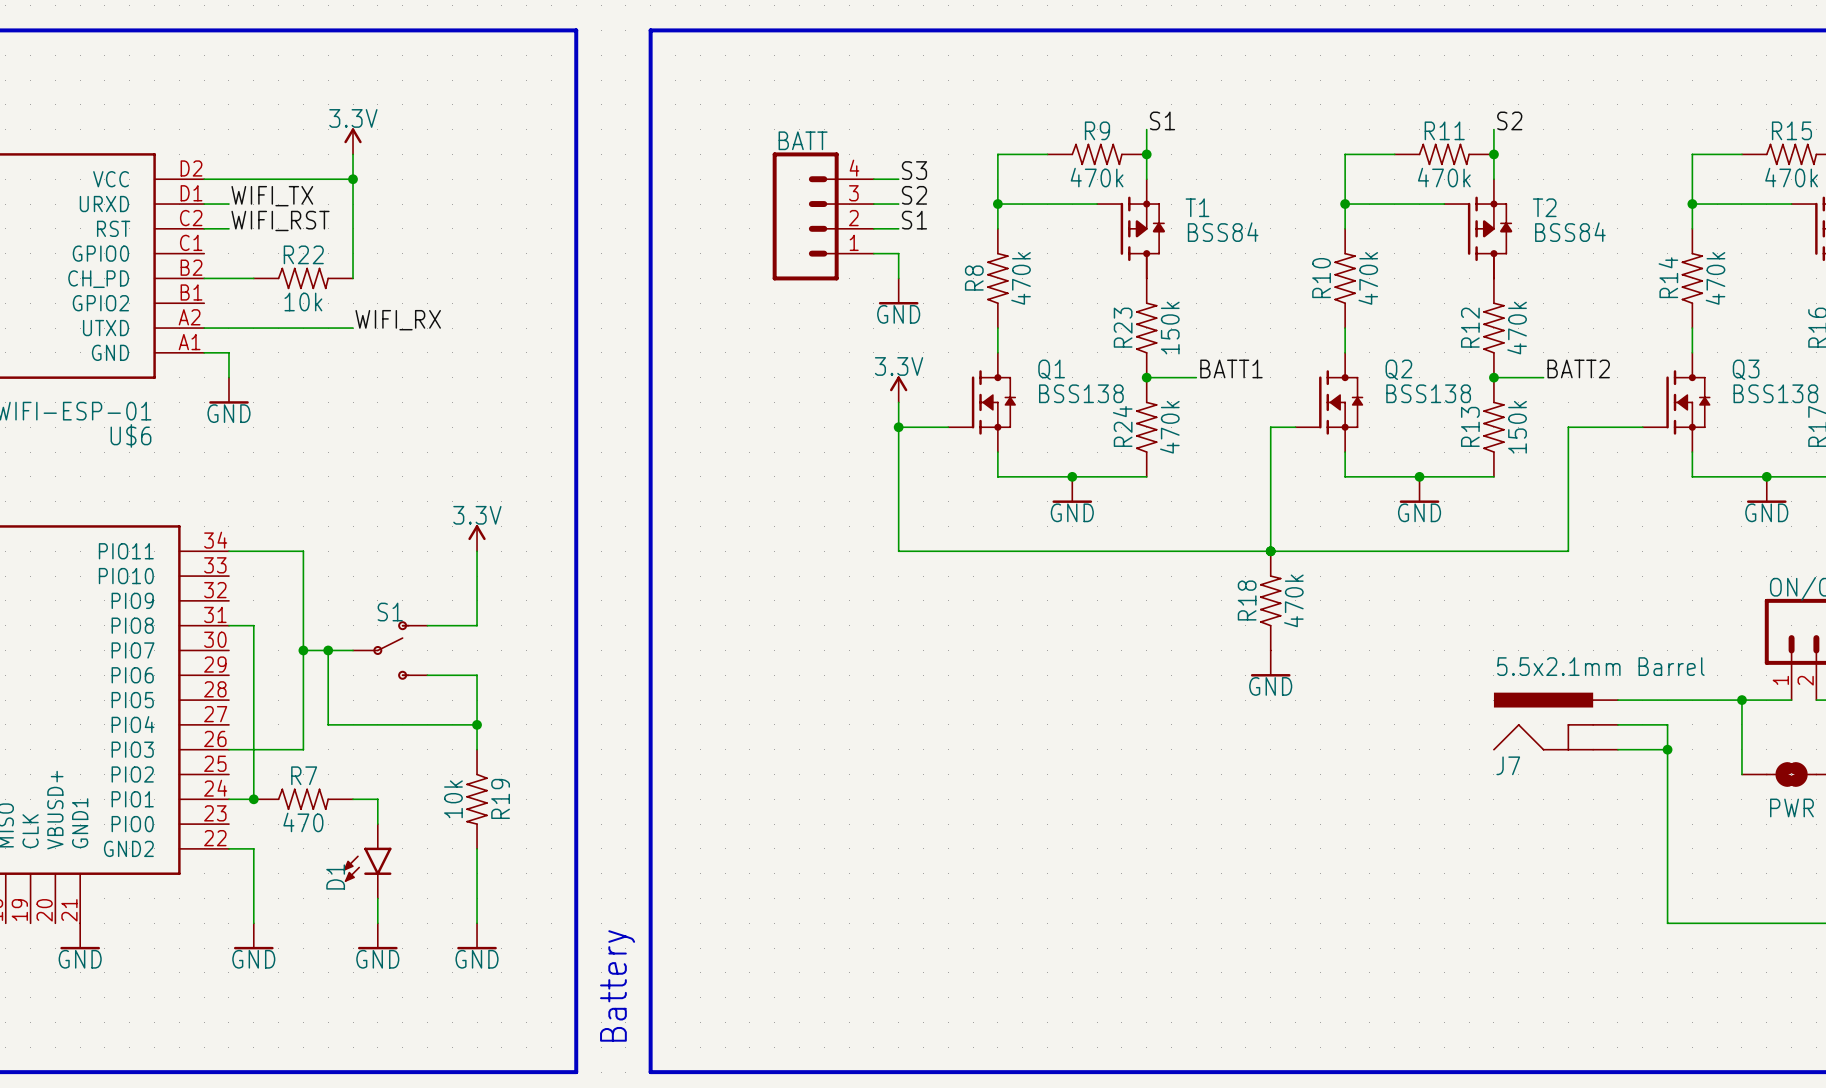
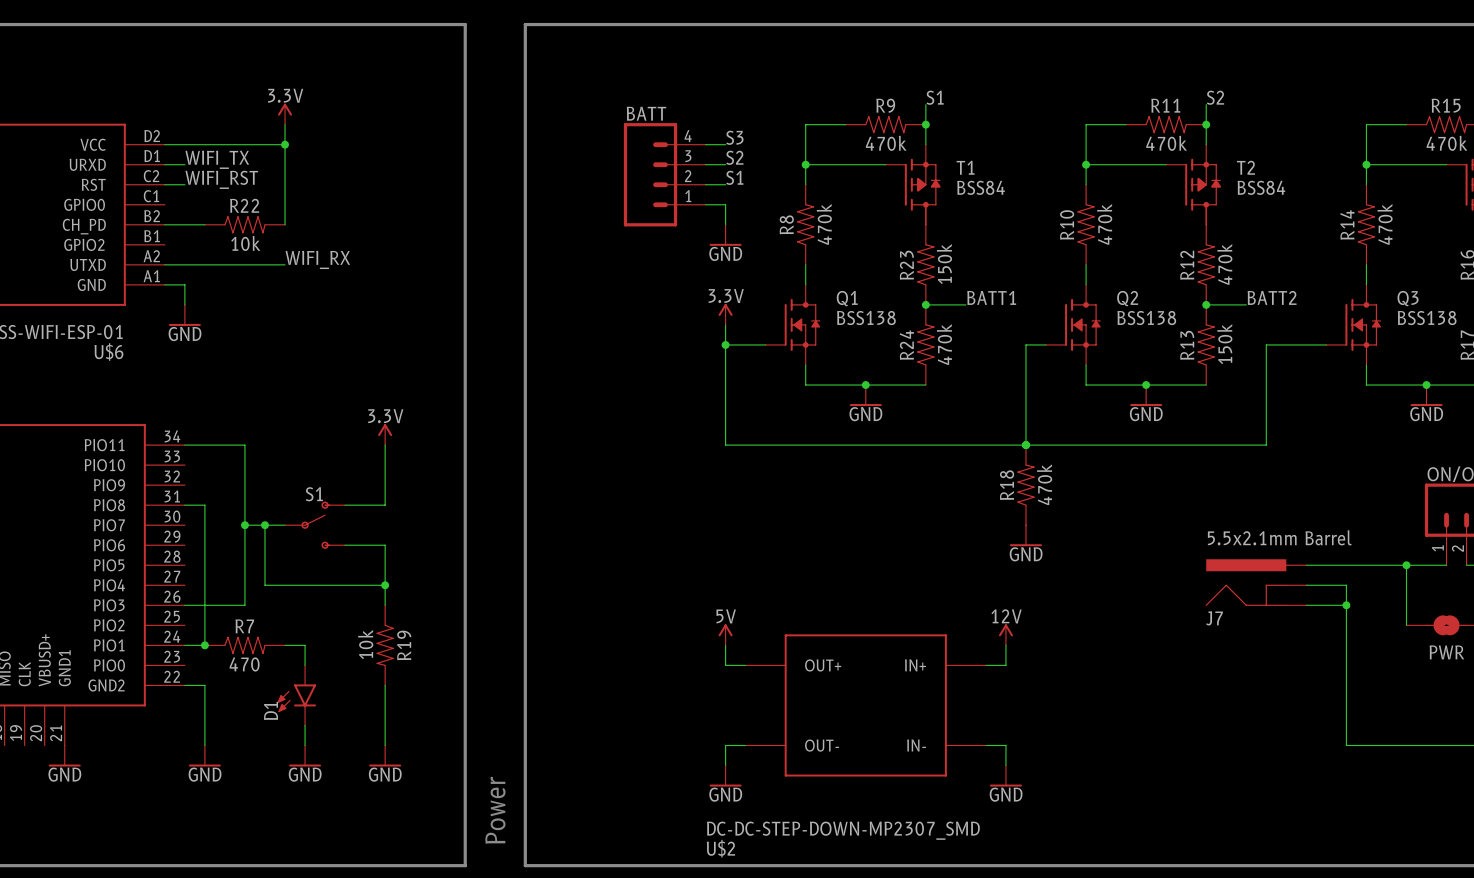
power symbol: none -> 5V (725, 634)
power symbol: none -> 12V (1005, 634)
wire: none -> (725, 645) (725, 665) (745, 665)
wire: none -> (1005, 645) (1005, 665) (985, 665)
U$2: none -> DC-DC-STEP-DOWN-MP2307_SMD (865, 705)
wire: none -> (745, 745) (725, 745) (725, 765)
wire: none -> (985, 745) (1005, 745) (1005, 765)
power symbol: none -> GND (725, 776)
power symbol: none -> GND (1005, 776)
text: Battery (617, 985) -> Power (495, 810)

